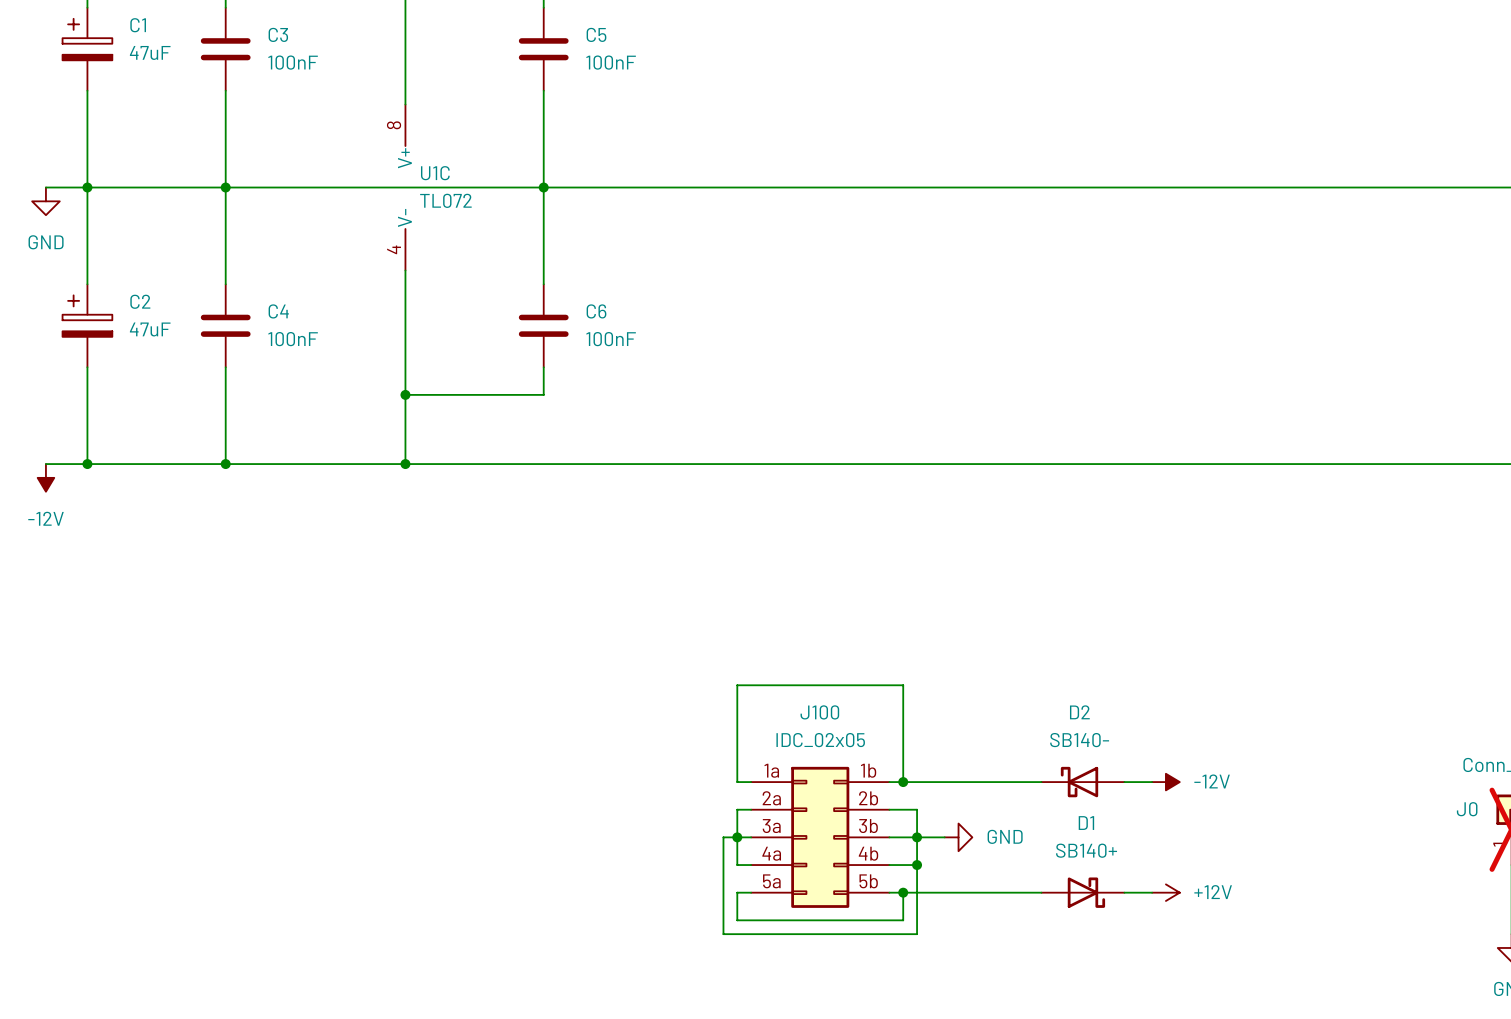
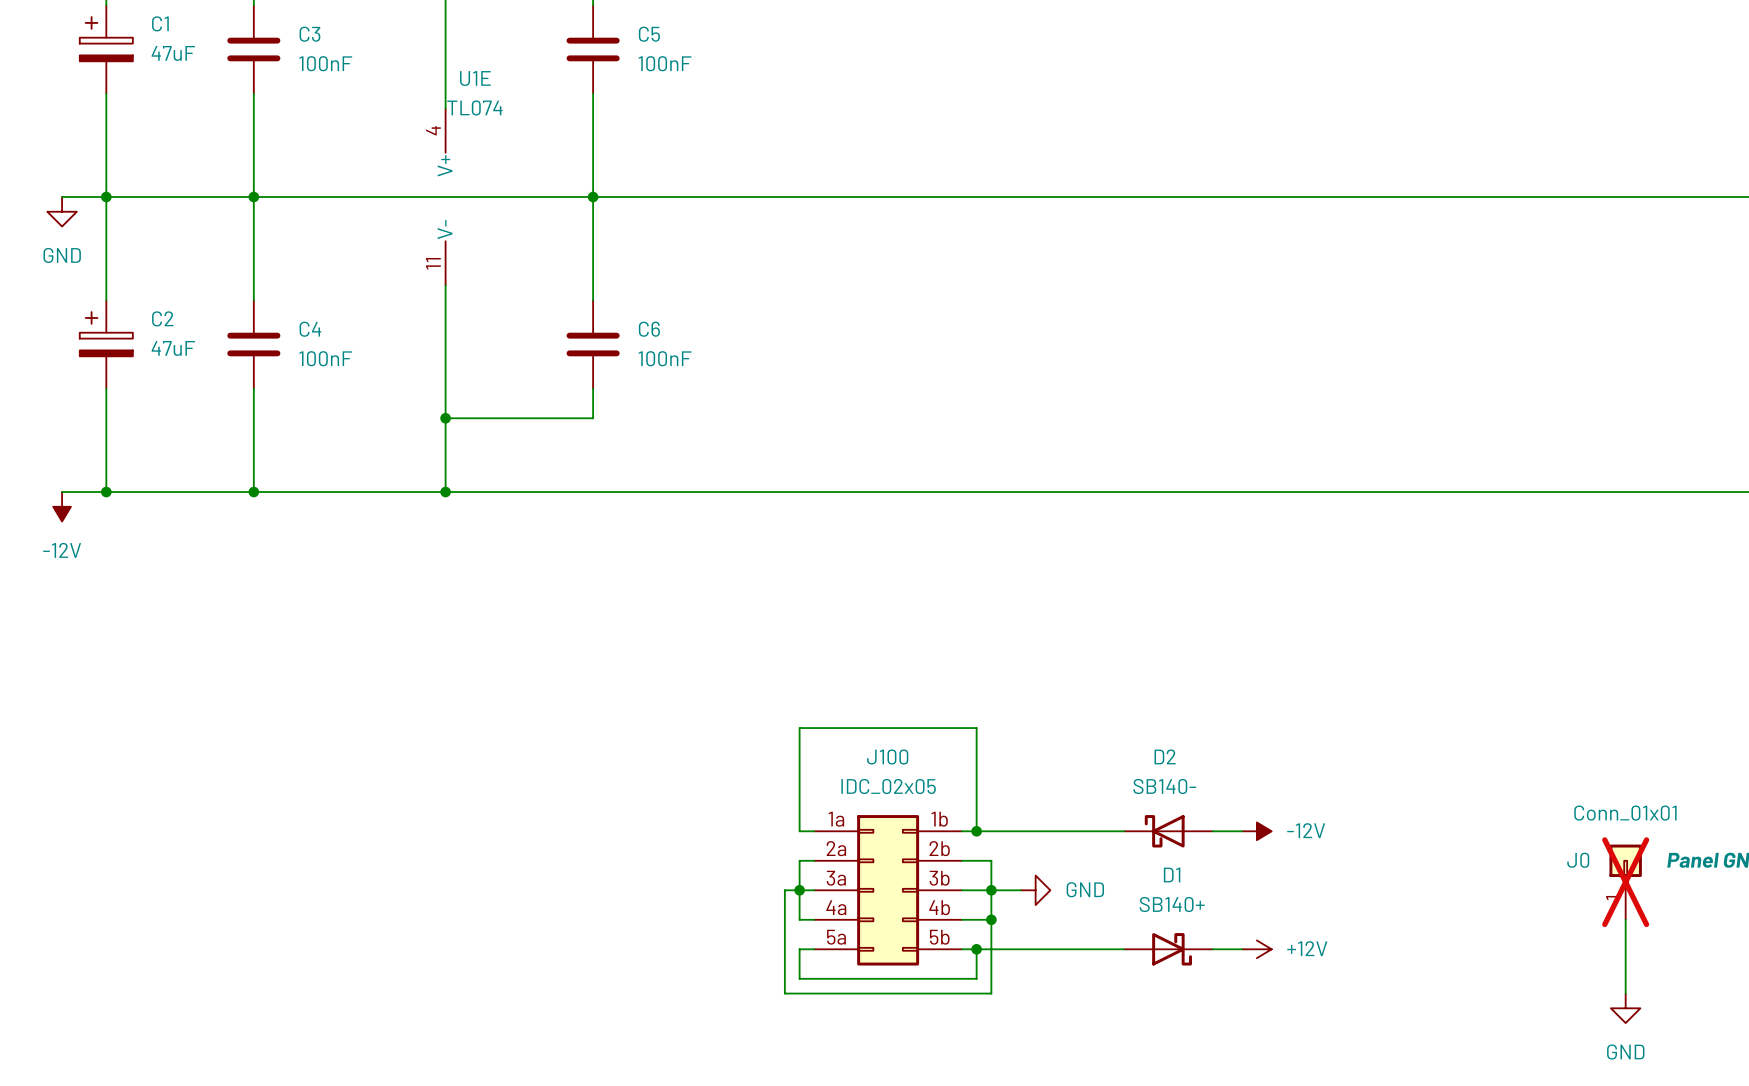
U1C pin number: 8 (394, 125) -> 4 (433, 130)
U1C name: U1C (435, 173) -> U1E (475, 78)
U1C value: TL072 (445, 200) -> TL074 (474, 107)
U1C pin number: 4 (394, 249) -> 11 (433, 263)

